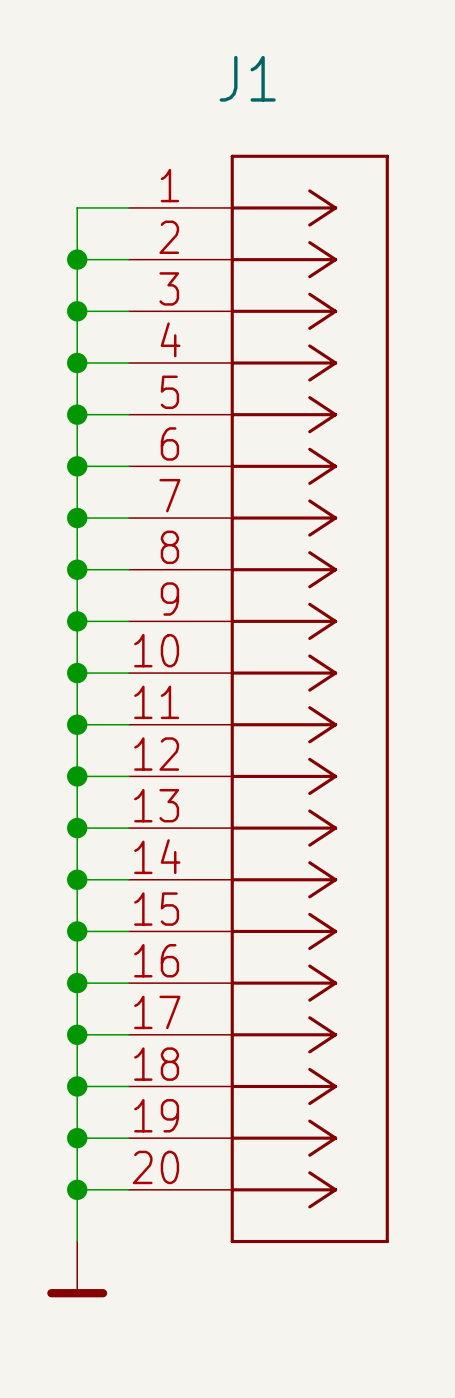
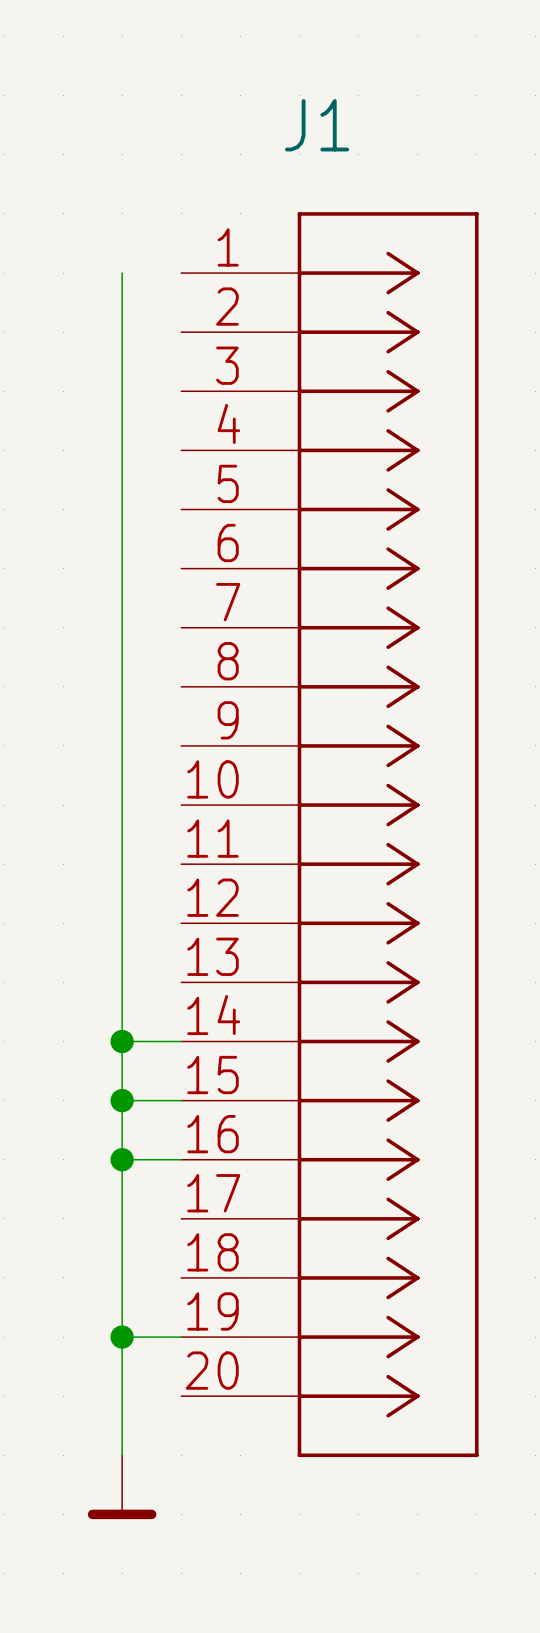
wire: (77, 207) (128, 207) -> none
wire: (77, 259) (128, 259) -> none
junction: (77, 259) -> none
wire: (77, 311) (128, 311) -> none
junction: (77, 311) -> none
wire: (77, 362) (128, 362) -> none
junction: (77, 362) -> none
wire: (77, 414) (128, 414) -> none
junction: (77, 414) -> none
wire: (77, 466) (128, 466) -> none
junction: (77, 466) -> none
wire: (77, 518) (128, 518) -> none
junction: (77, 518) -> none
wire: (77, 569) (128, 569) -> none
junction: (77, 569) -> none
wire: (77, 621) (128, 621) -> none
junction: (77, 621) -> none
wire: (77, 673) (128, 673) -> none
junction: (77, 673) -> none
wire: (77, 724) (128, 724) -> none
junction: (77, 724) -> none
wire: (77, 776) (128, 776) -> none
junction: (77, 776) -> none
wire: (77, 828) (128, 828) -> none
junction: (77, 828) -> none
wire: (77, 1034) (128, 1034) -> none
junction: (77, 1034) -> none
wire: (77, 1086) (128, 1086) -> none
junction: (77, 1086) -> none
wire: (77, 1189) (128, 1189) -> none
junction: (77, 1189) -> none

